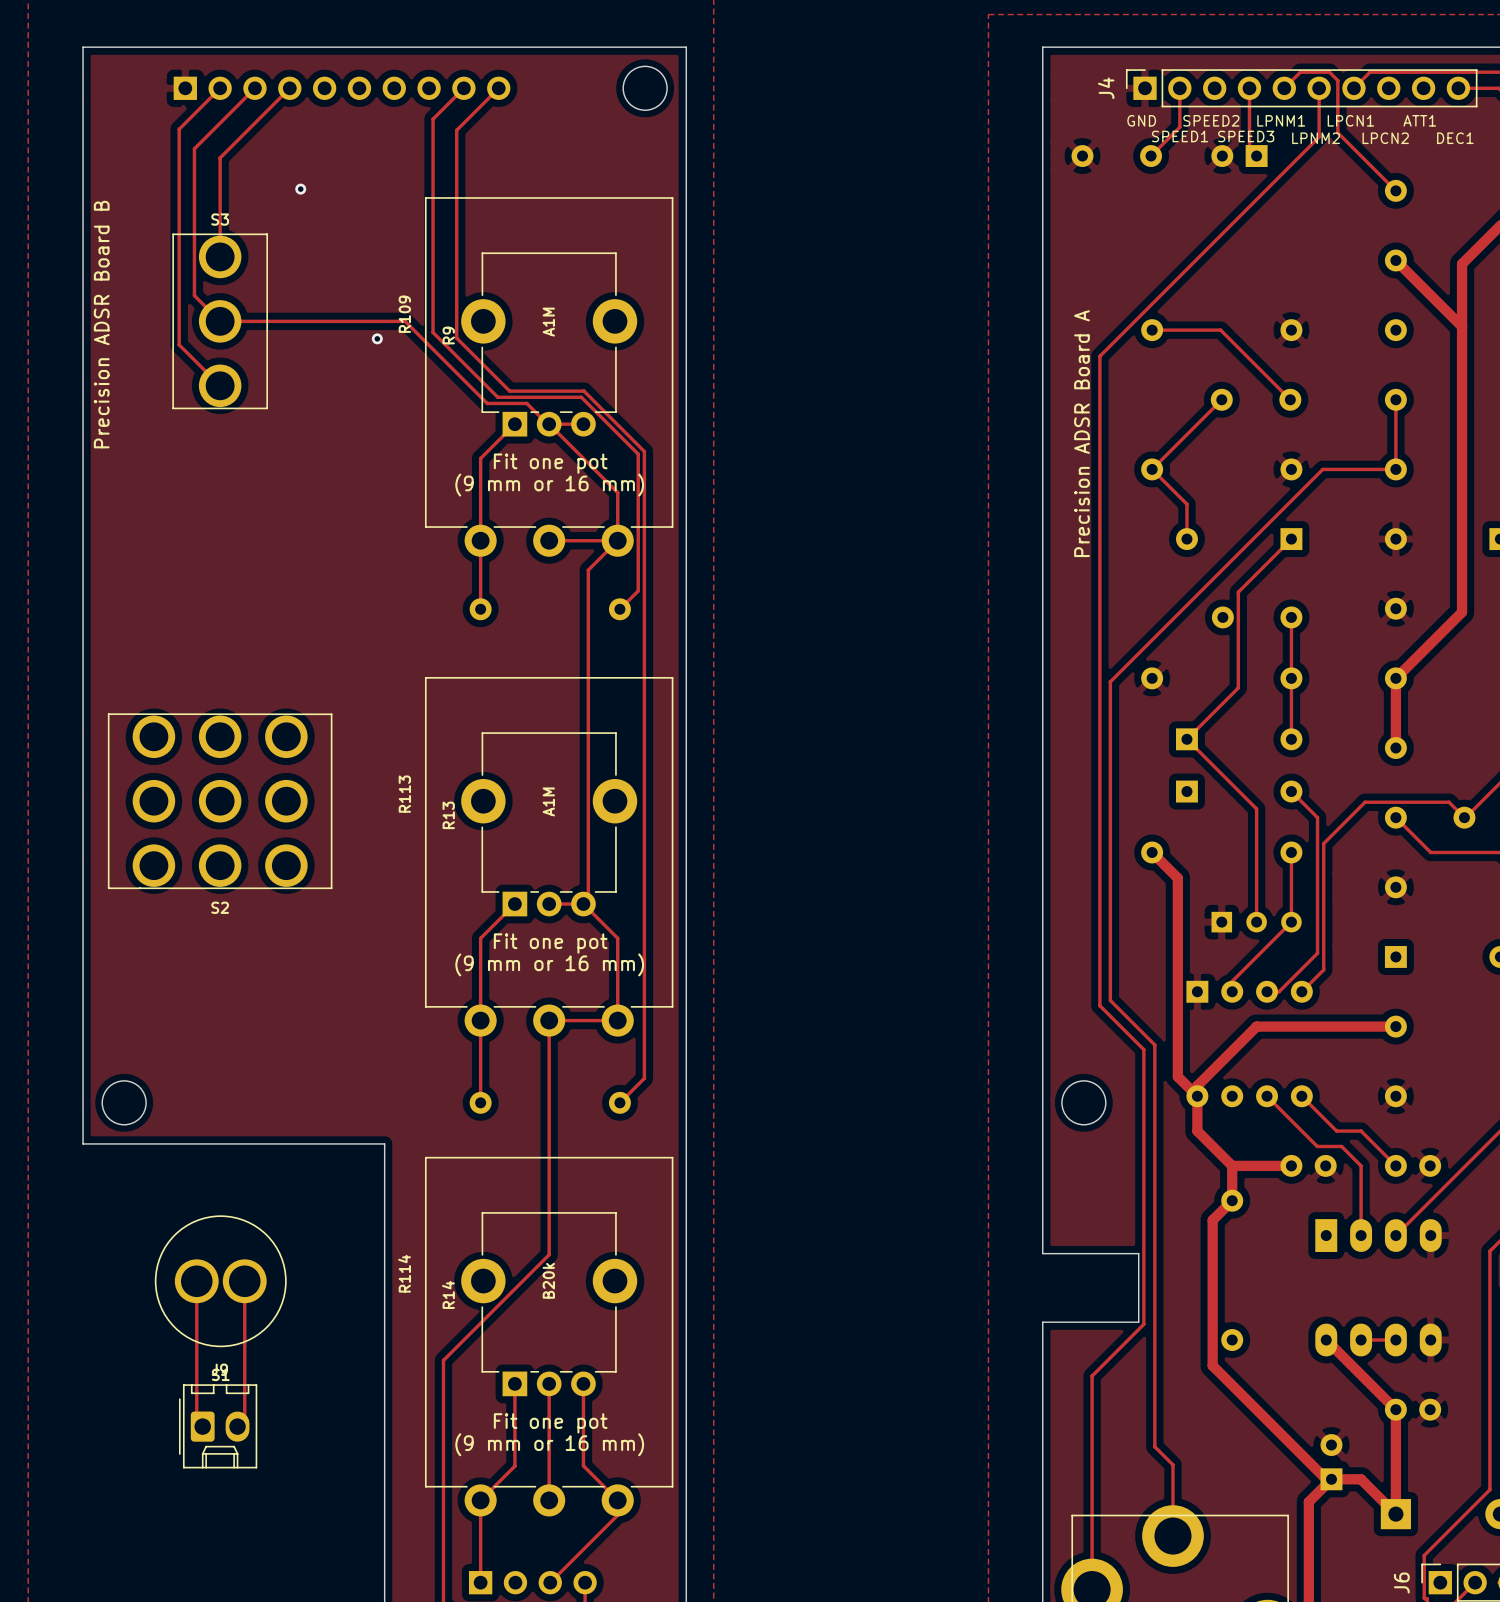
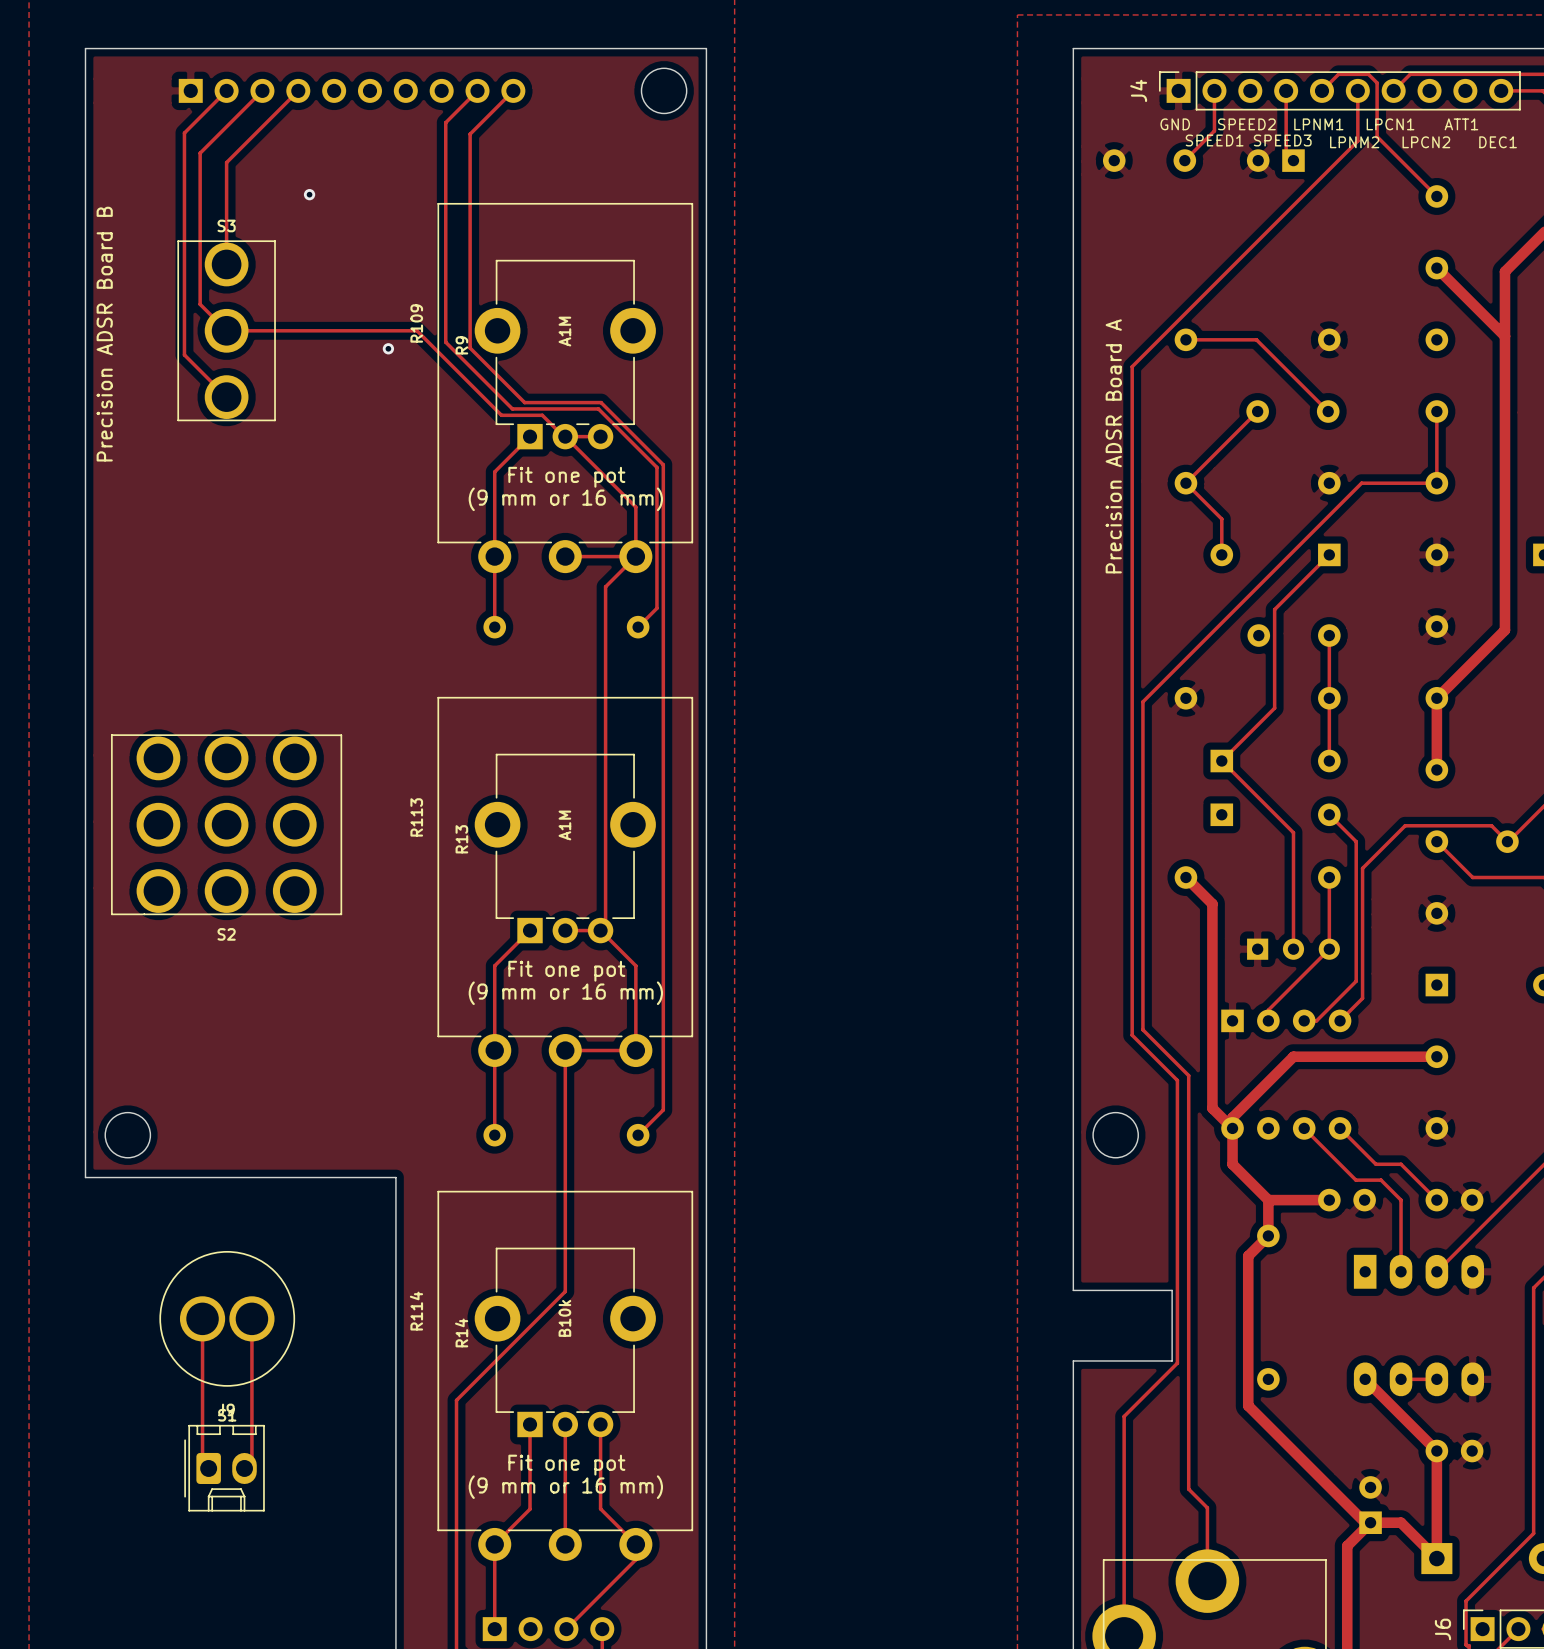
R114 value: B20k (548, 1280) -> B10k (564, 1318)

